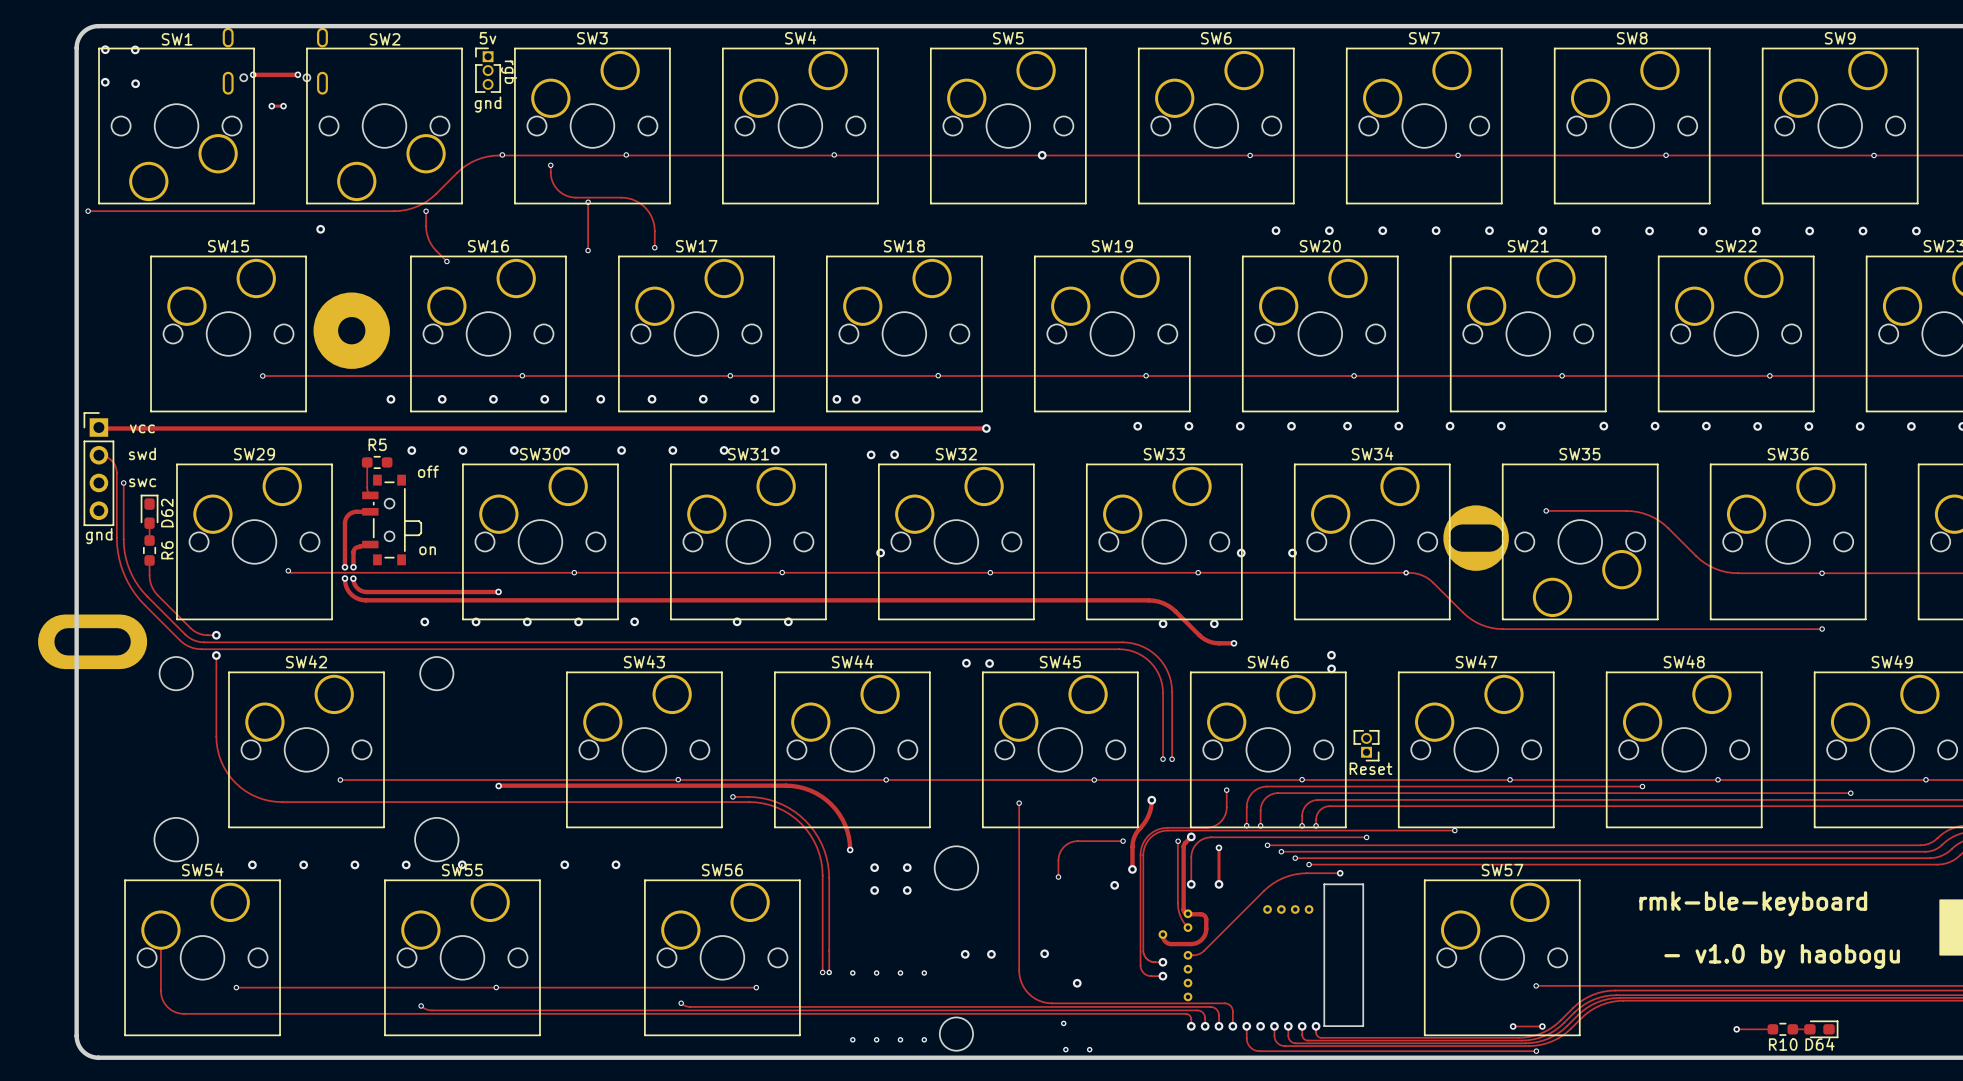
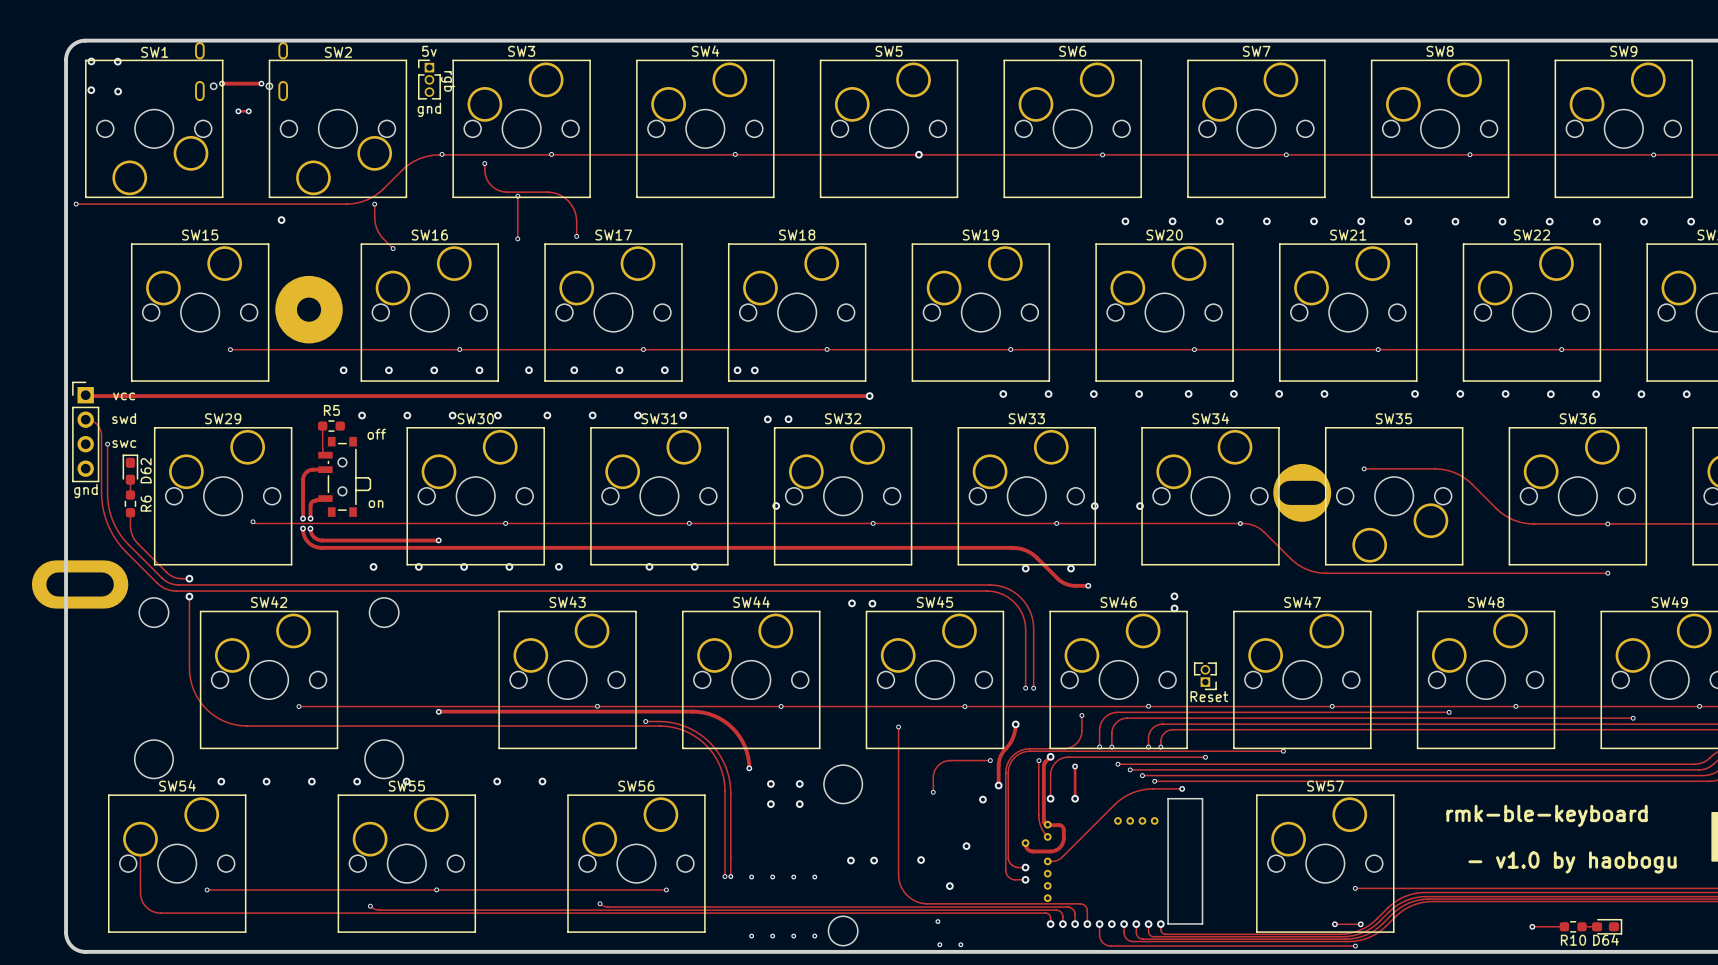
via: none -> (966, 846)

